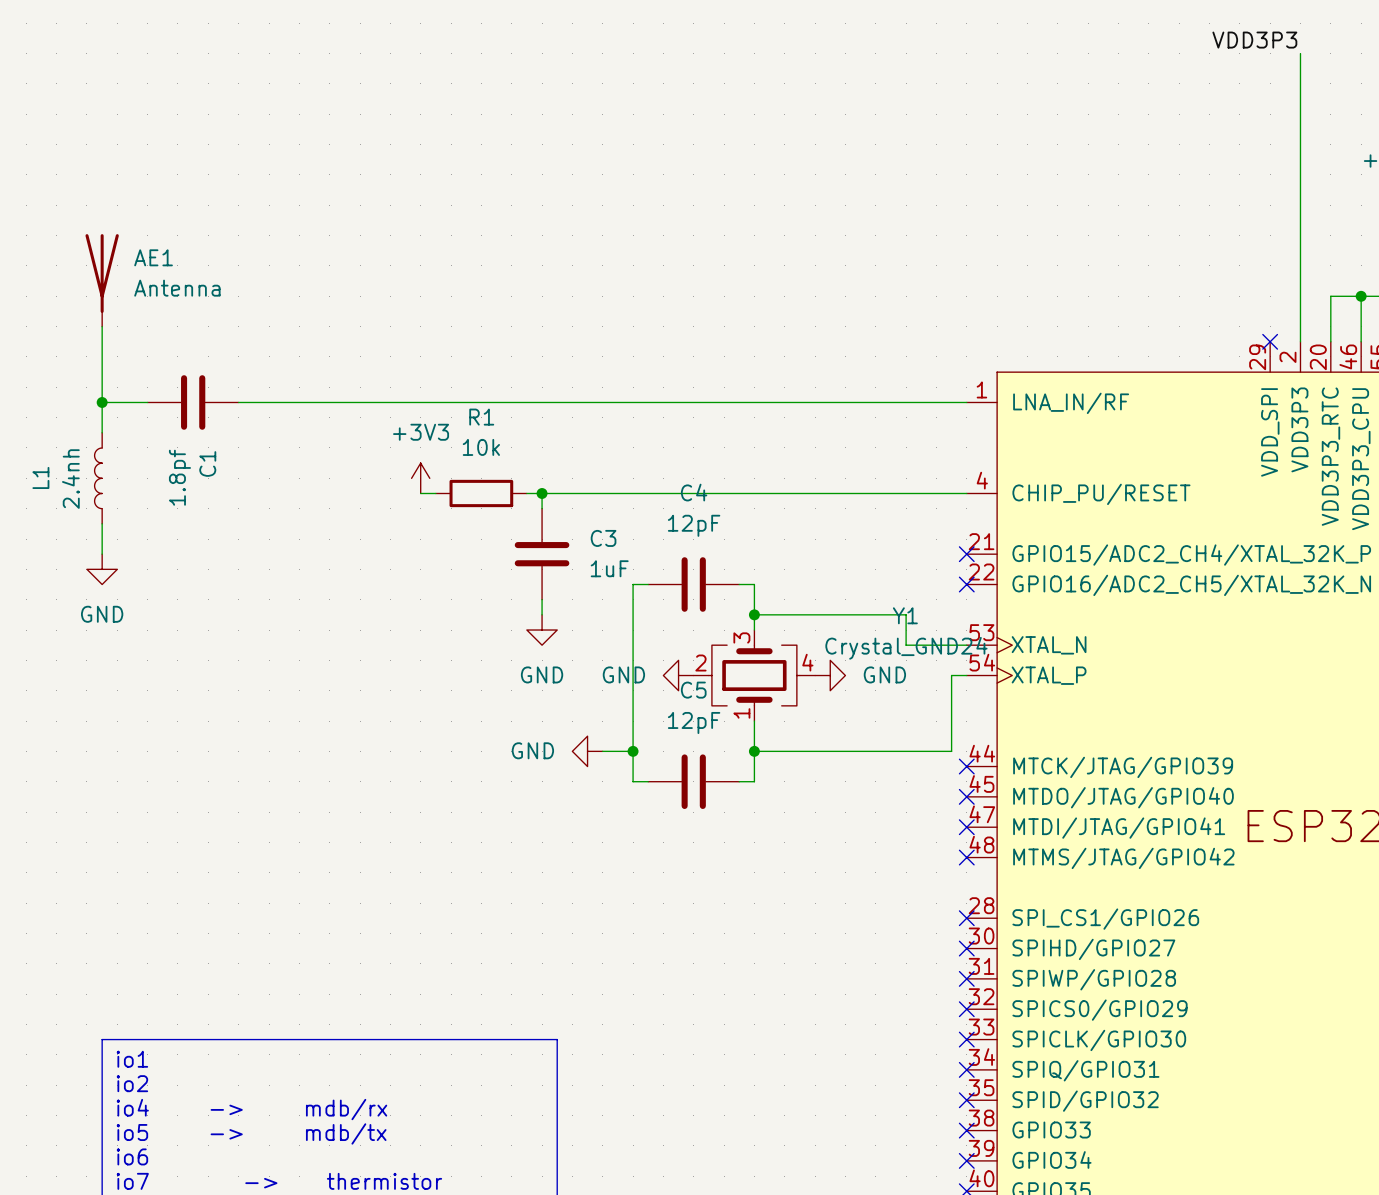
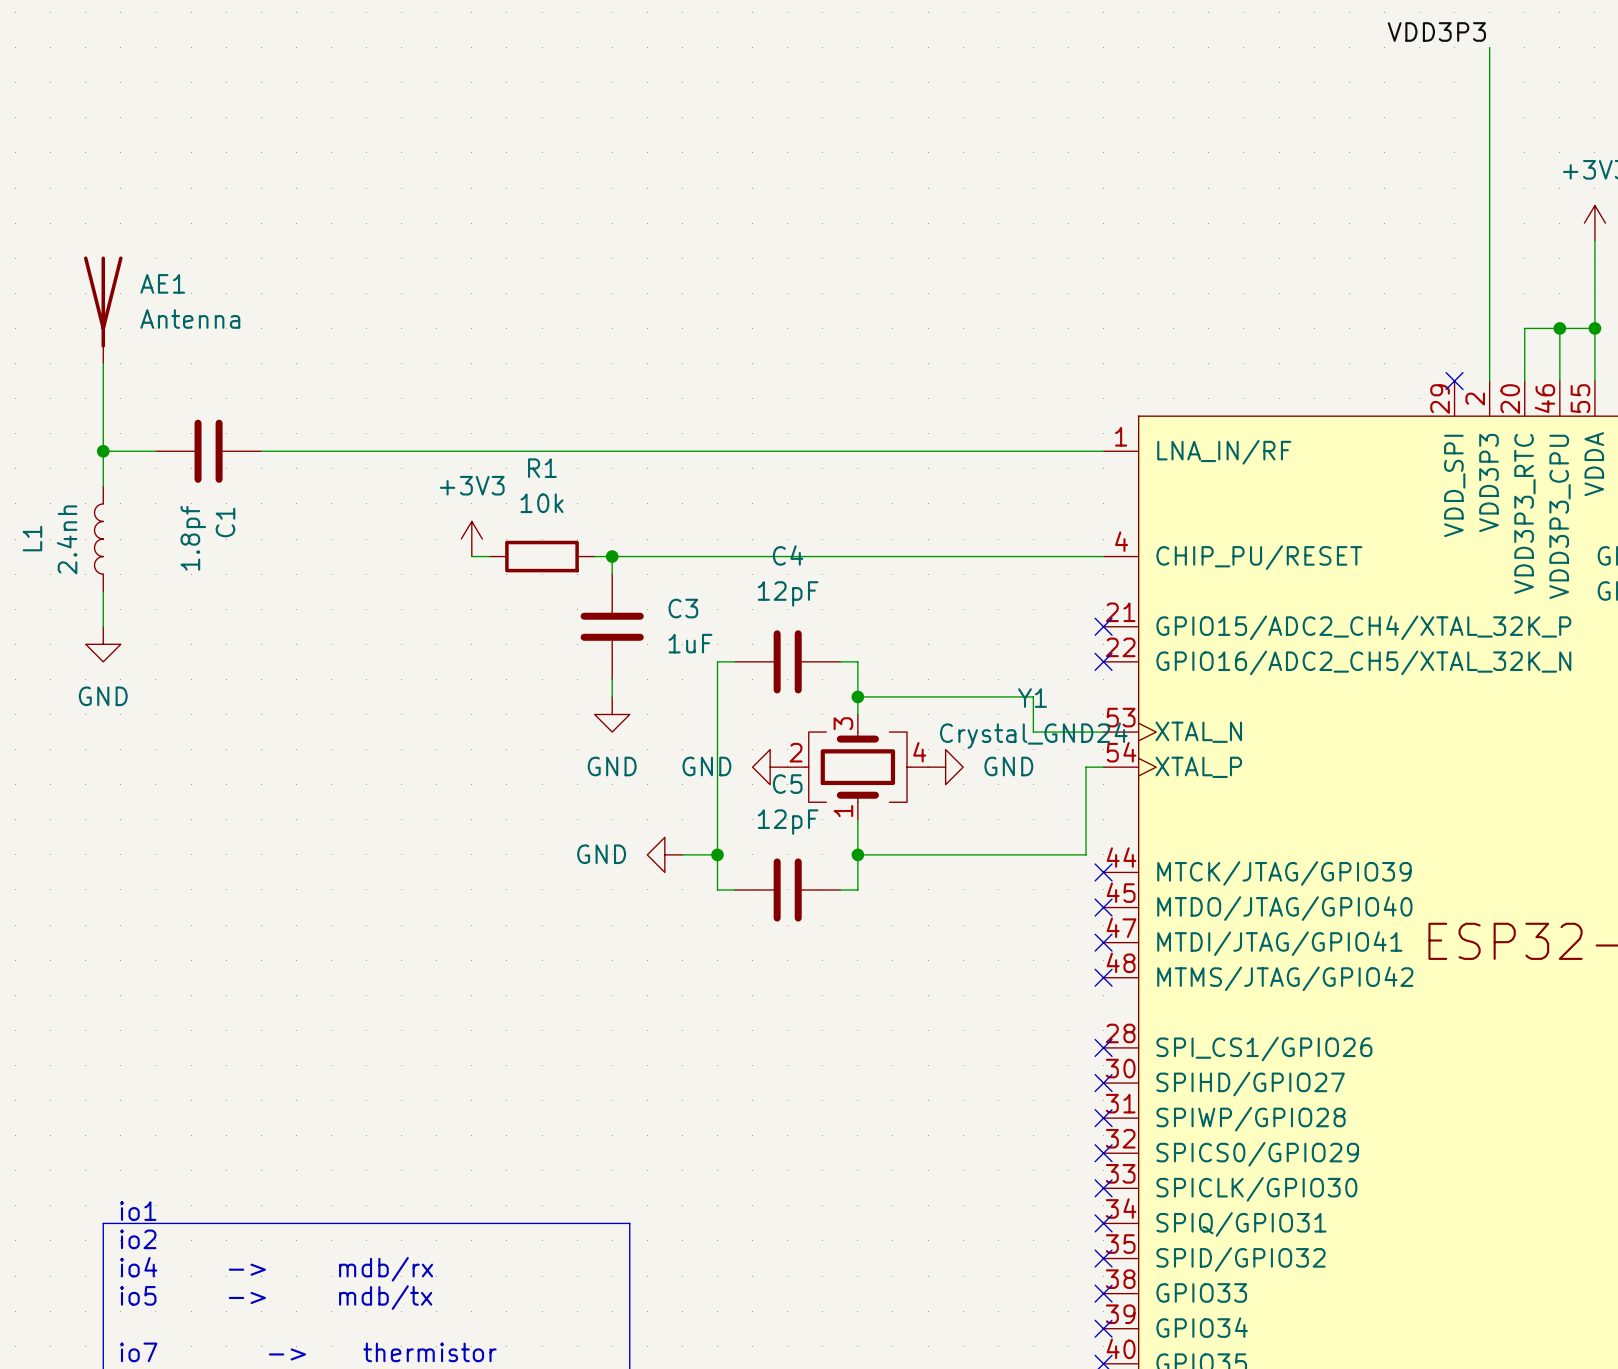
line: (102, 1069) (102, 1039) (557, 1039) (557, 1069) -> (103, 1223) (629, 1223)
text: io6 (132, 1156) -> none

